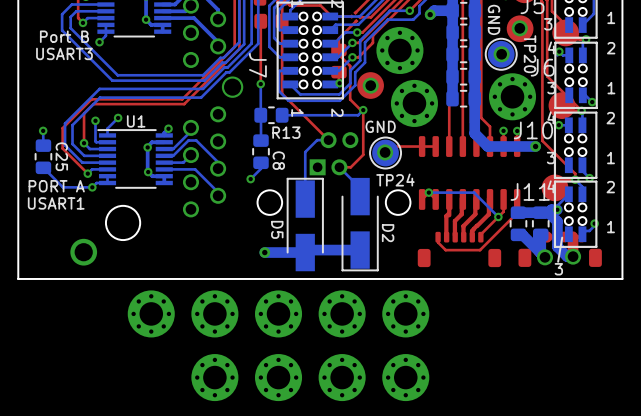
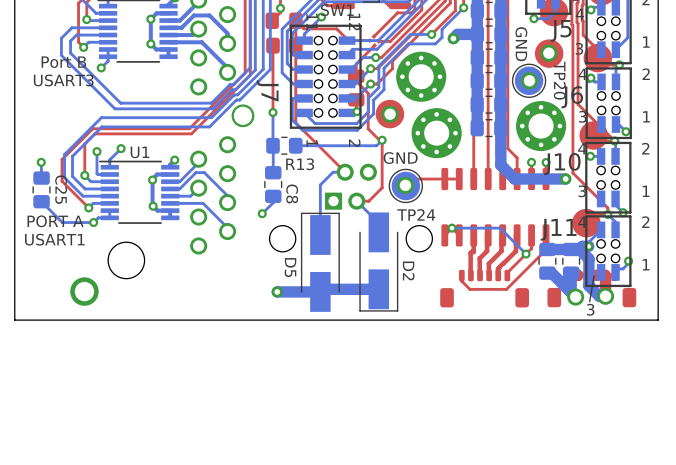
part: (151, 313) -> none
part: (214, 313) -> none
part: (278, 313) -> none
part: (342, 313) -> none
part: (405, 313) -> none
part: (214, 377) -> none
part: (278, 377) -> none
part: (342, 377) -> none
part: (405, 377) -> none

